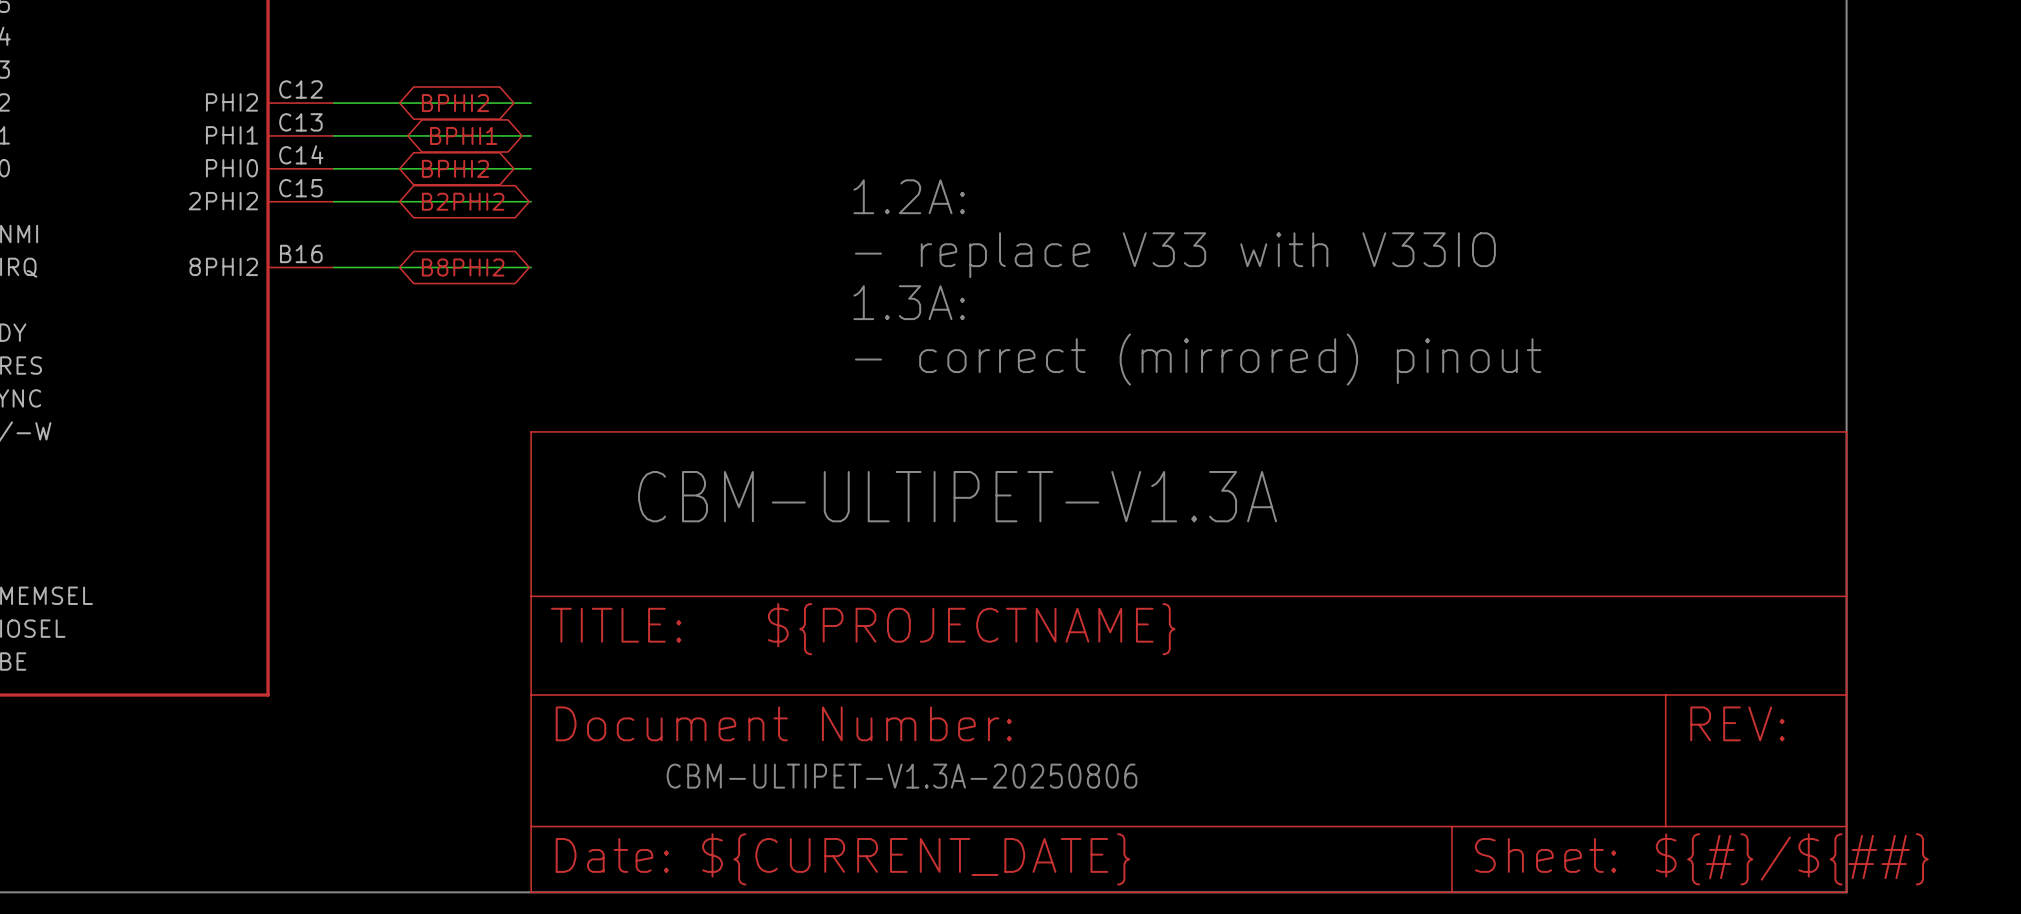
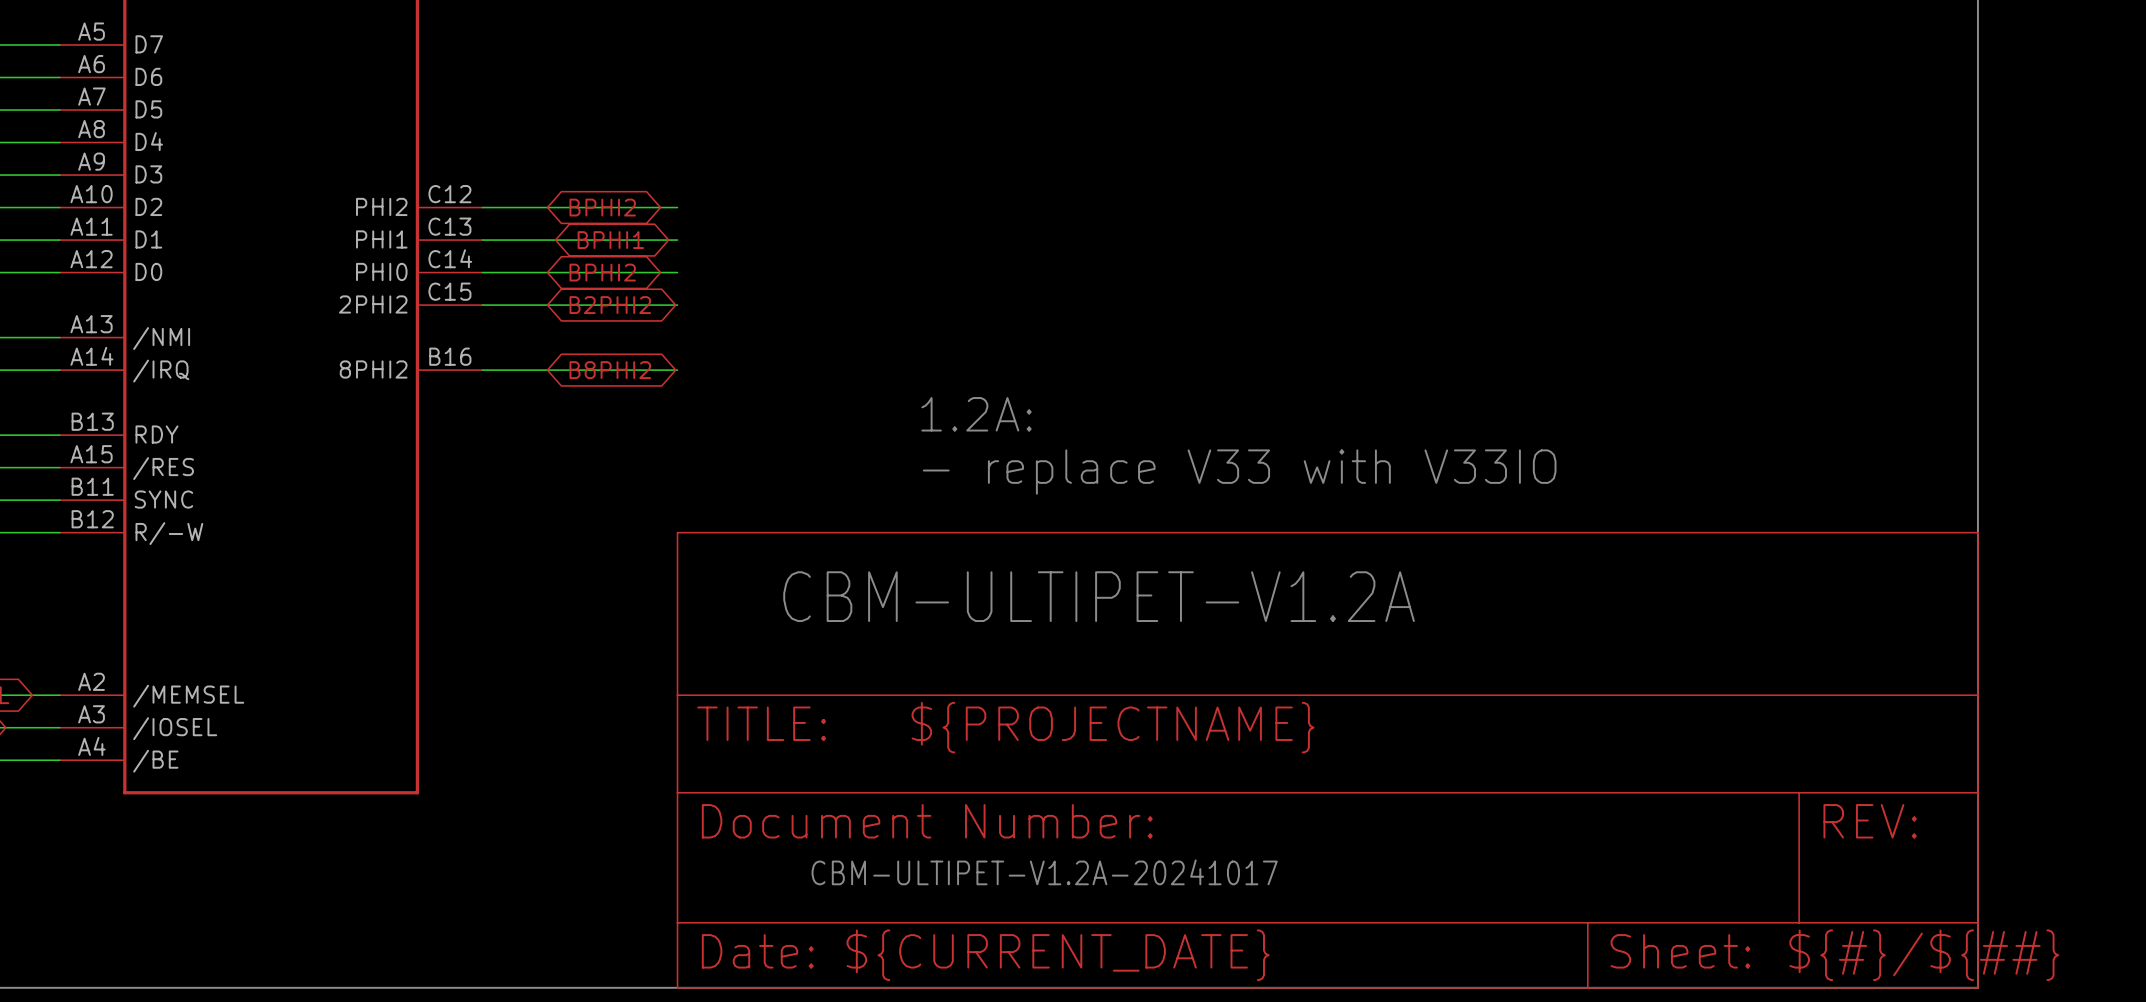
text position: 1.2A: (909, 196) -> 1.2A: (976, 414)
text position: - replace V33 with V33IO (1175, 255) -> - replace V33 with V33IO (1239, 472)
text: 1.3A: (909, 302) -> none
text: - correct (mirrored) pinout (1198, 359) -> none
text: CBM-ULTIPET-V1.3A (957, 496) -> CBM-ULTIPET-V1.2A (1099, 596)
text: CBM-ULTIPET-V1.3A-20250806 (902, 776) -> CBM-ULTIPET-V1.2A-20241017 (1044, 872)

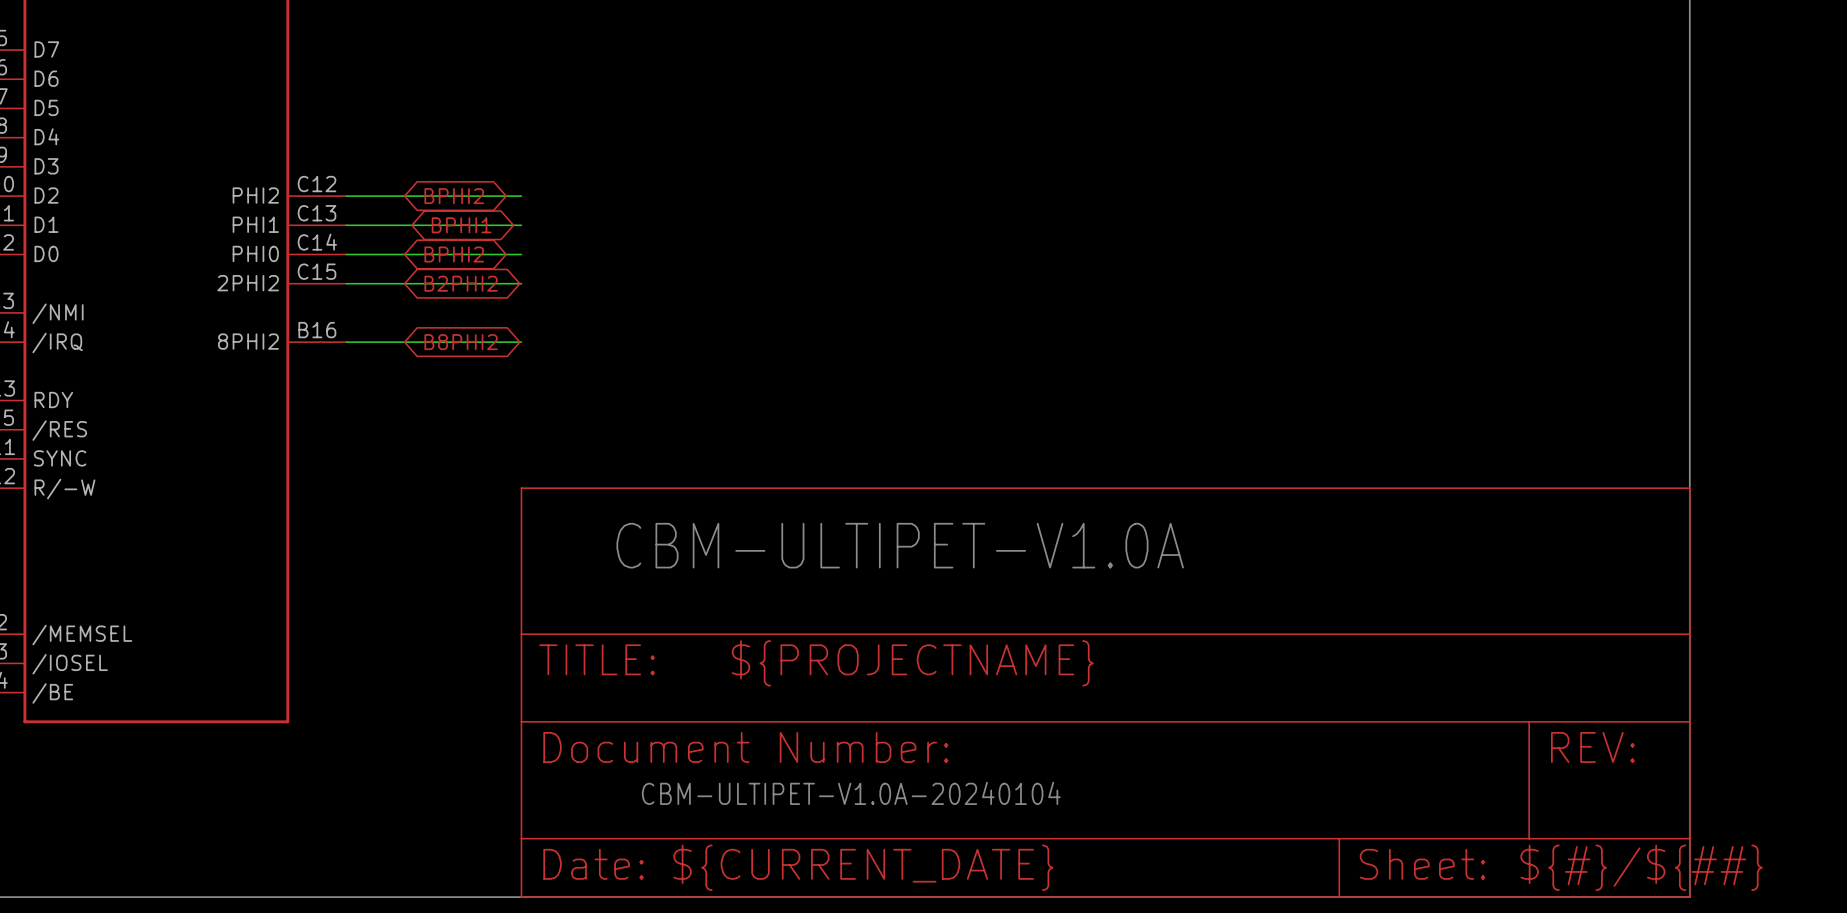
text: 1.2A: (976, 414) -> none
text: - replace V33 with V33IO (1239, 472) -> none
text: CBM-ULTIPET-V1.2A (1099, 596) -> CBM-ULTIPET-V1.0A (900, 545)
text: CBM-ULTIPET-V1.2A-20241017 (1044, 872) -> CBM-ULTIPET-V1.0A-20240104 (851, 793)

